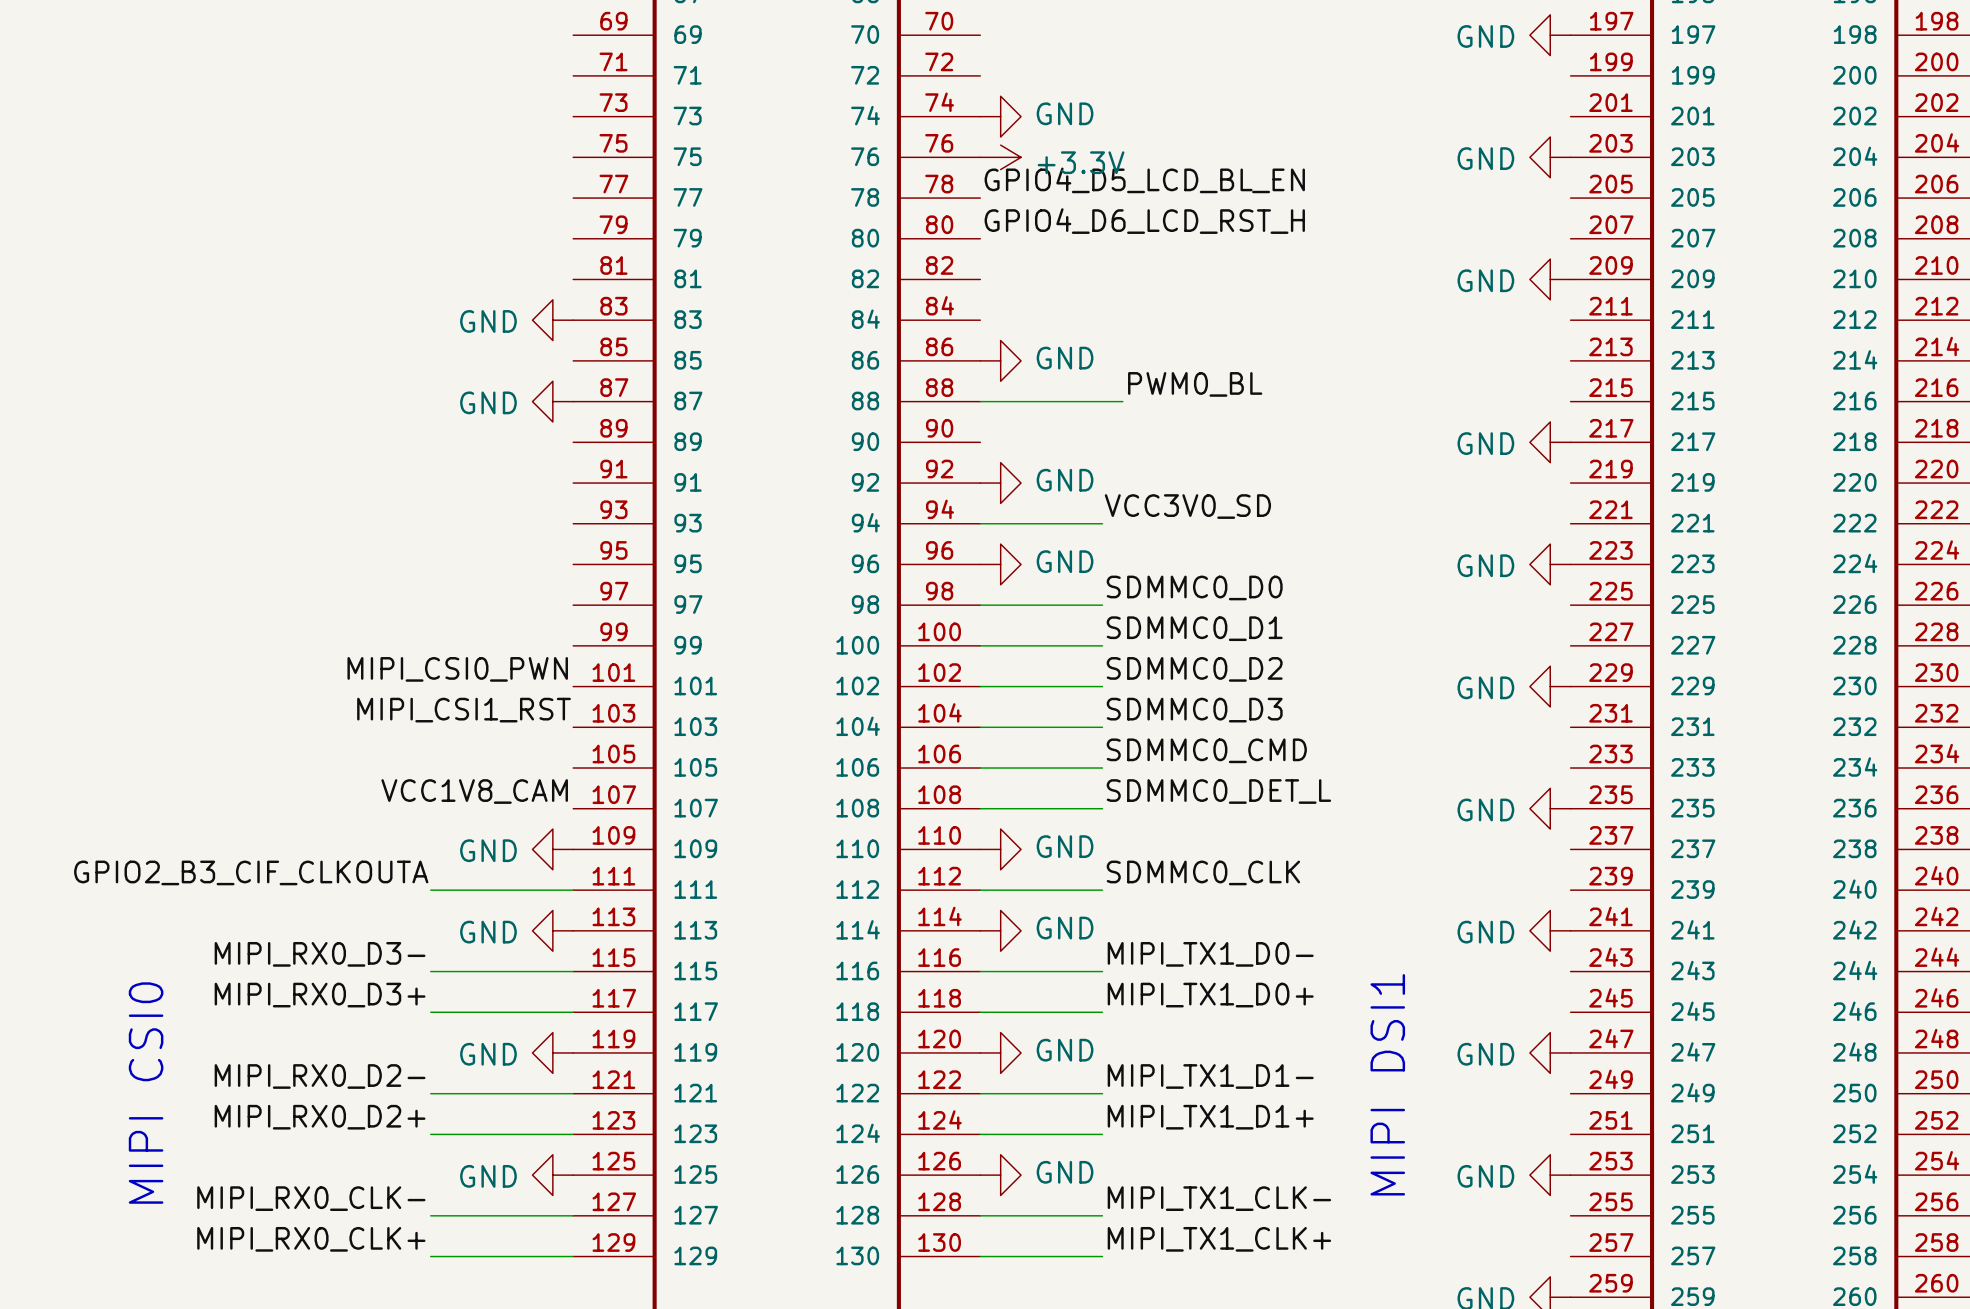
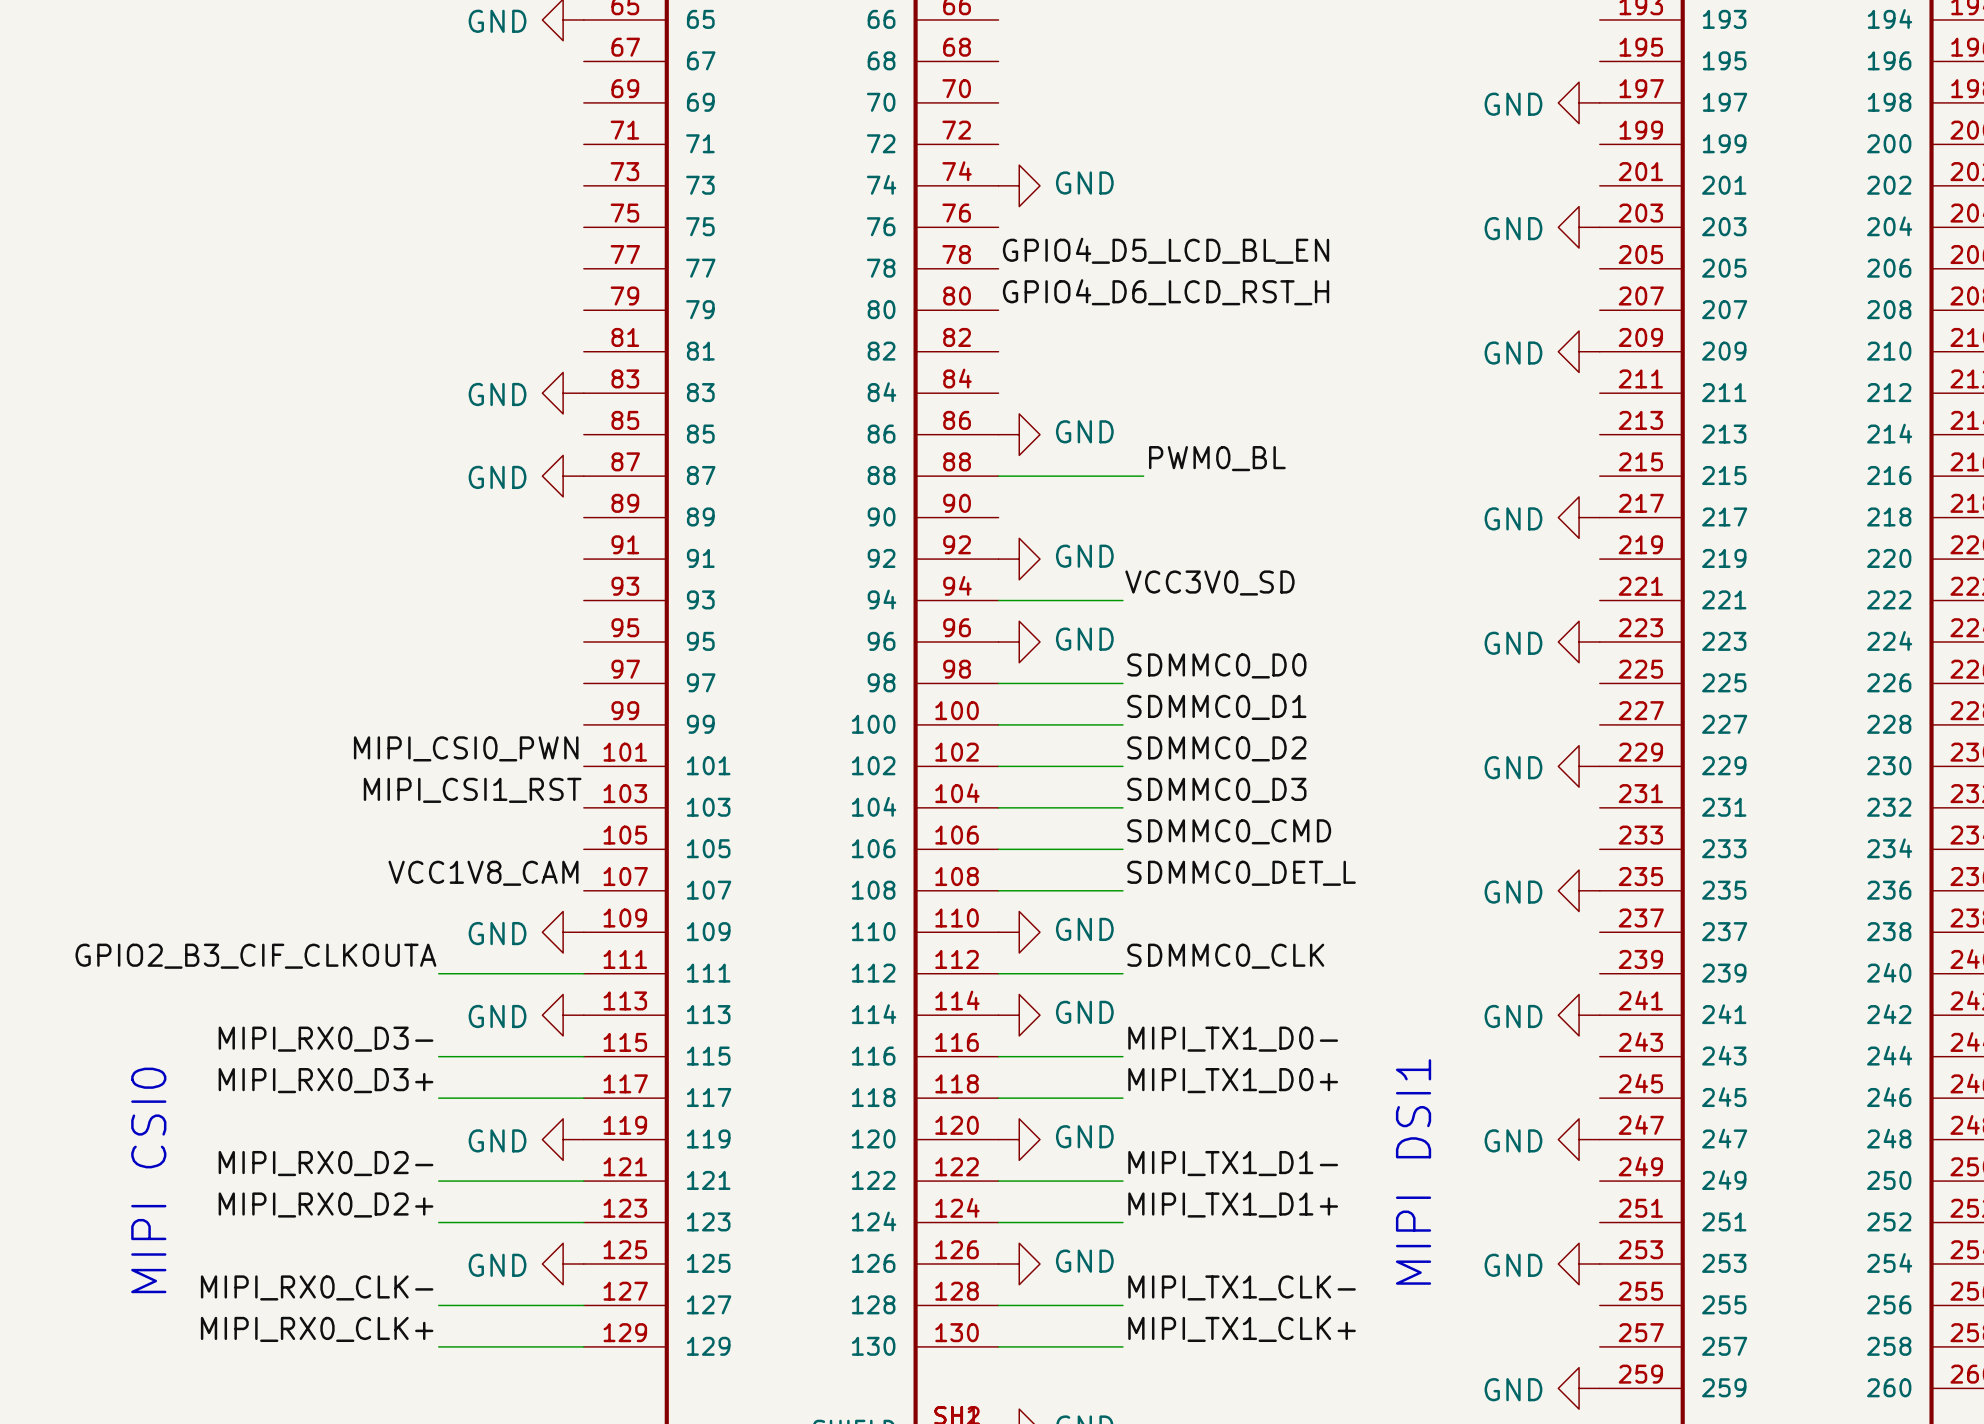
power symbol: +3.3V (1000, 157) -> none

